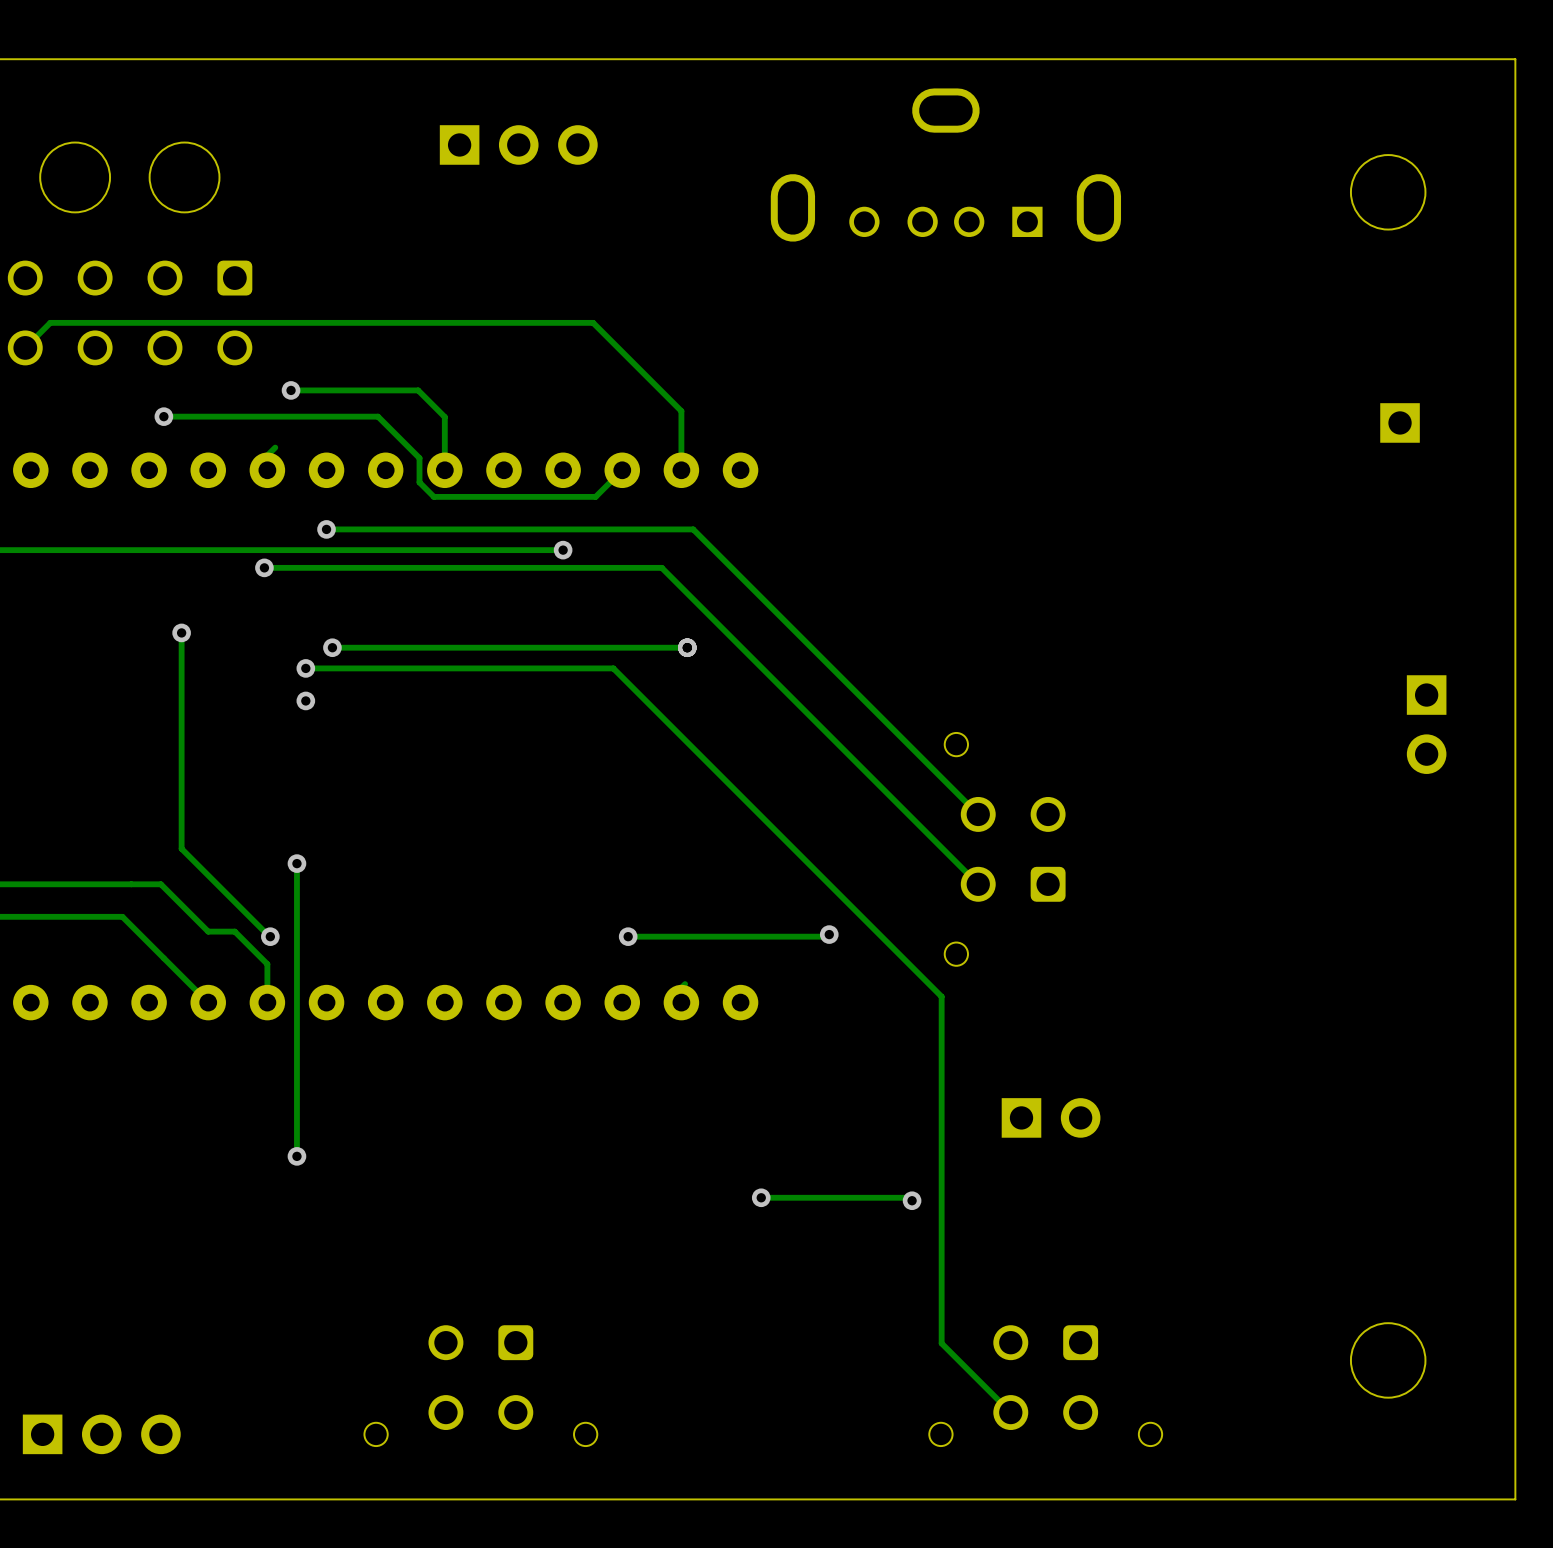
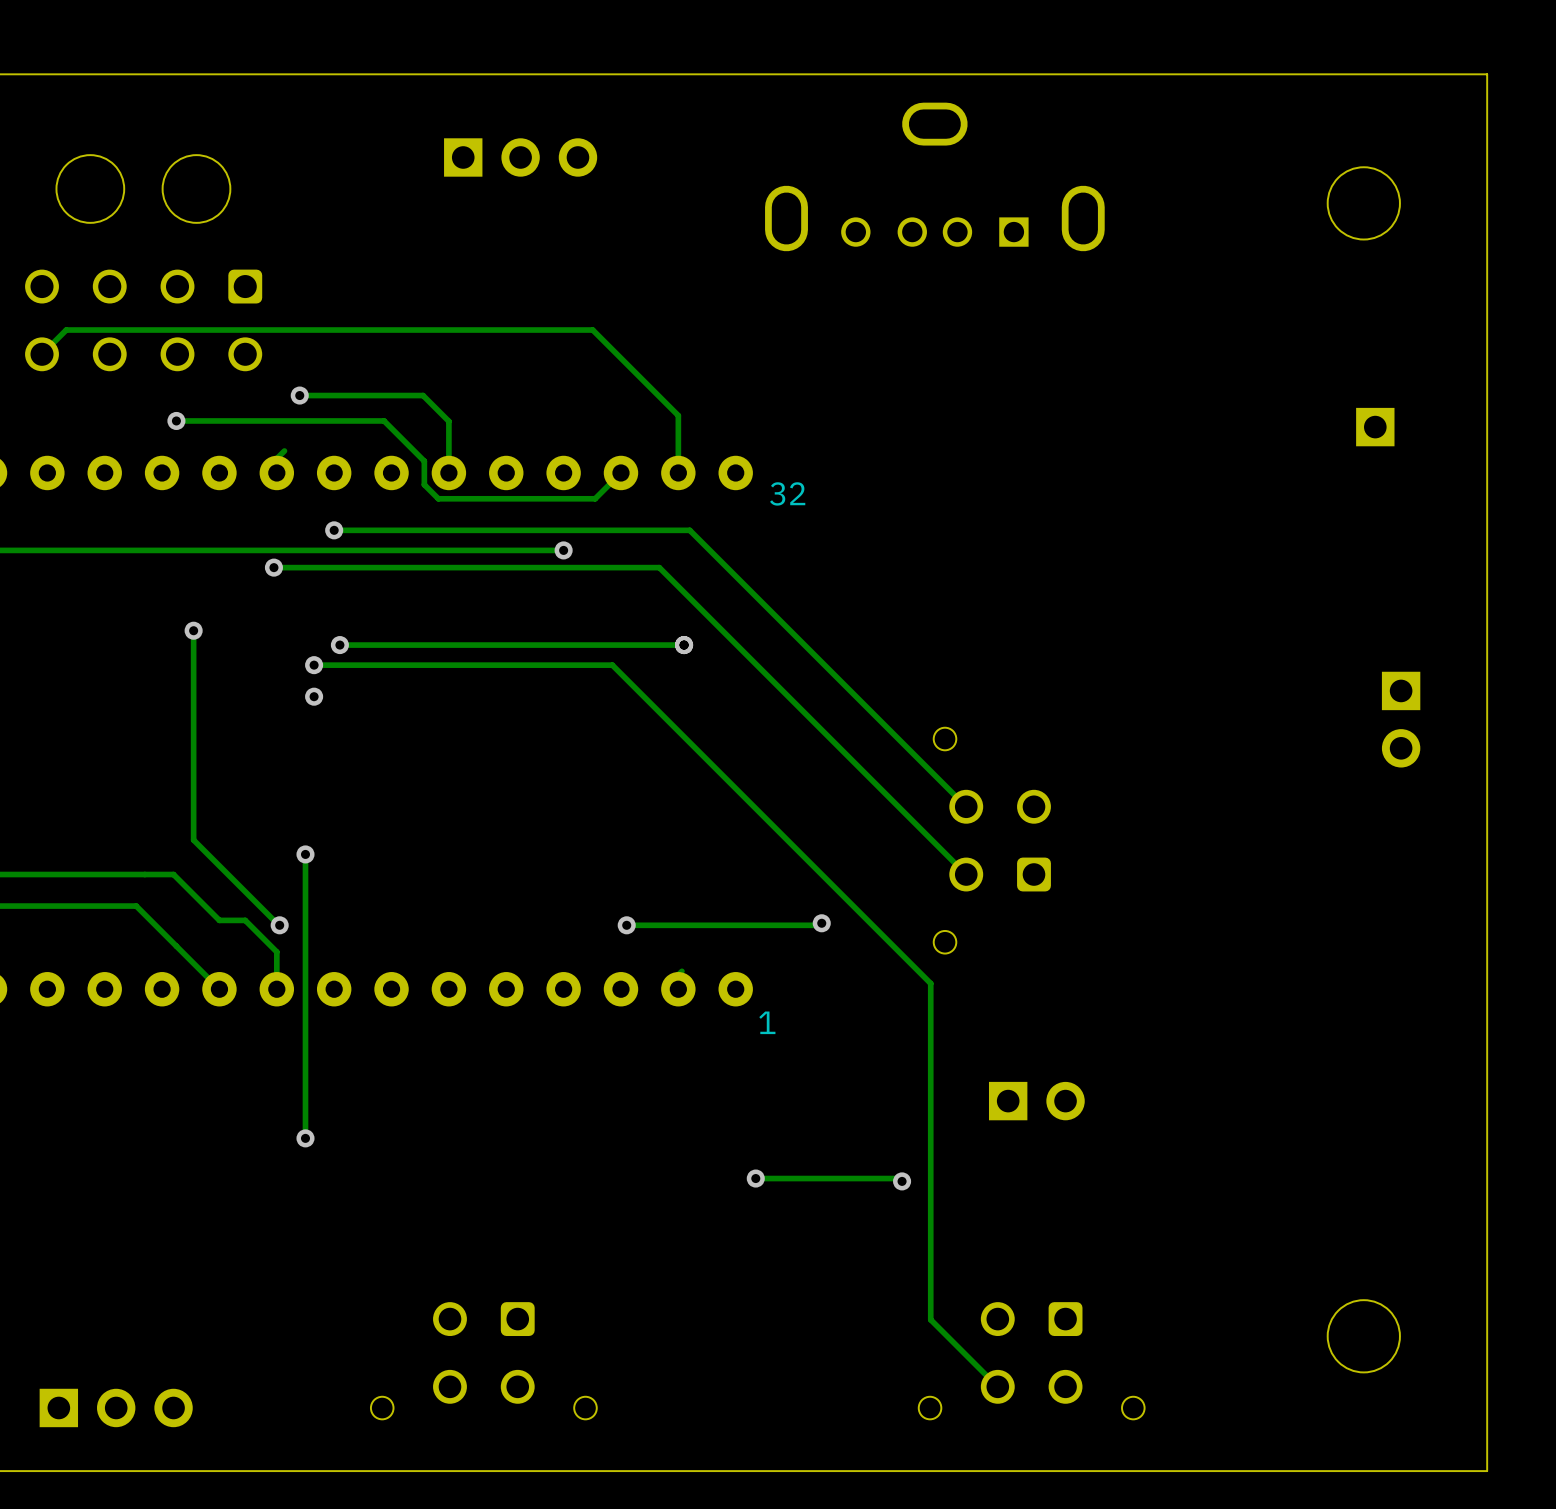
text: none -> 32 (787, 493)
text: none -> 1 (767, 1022)

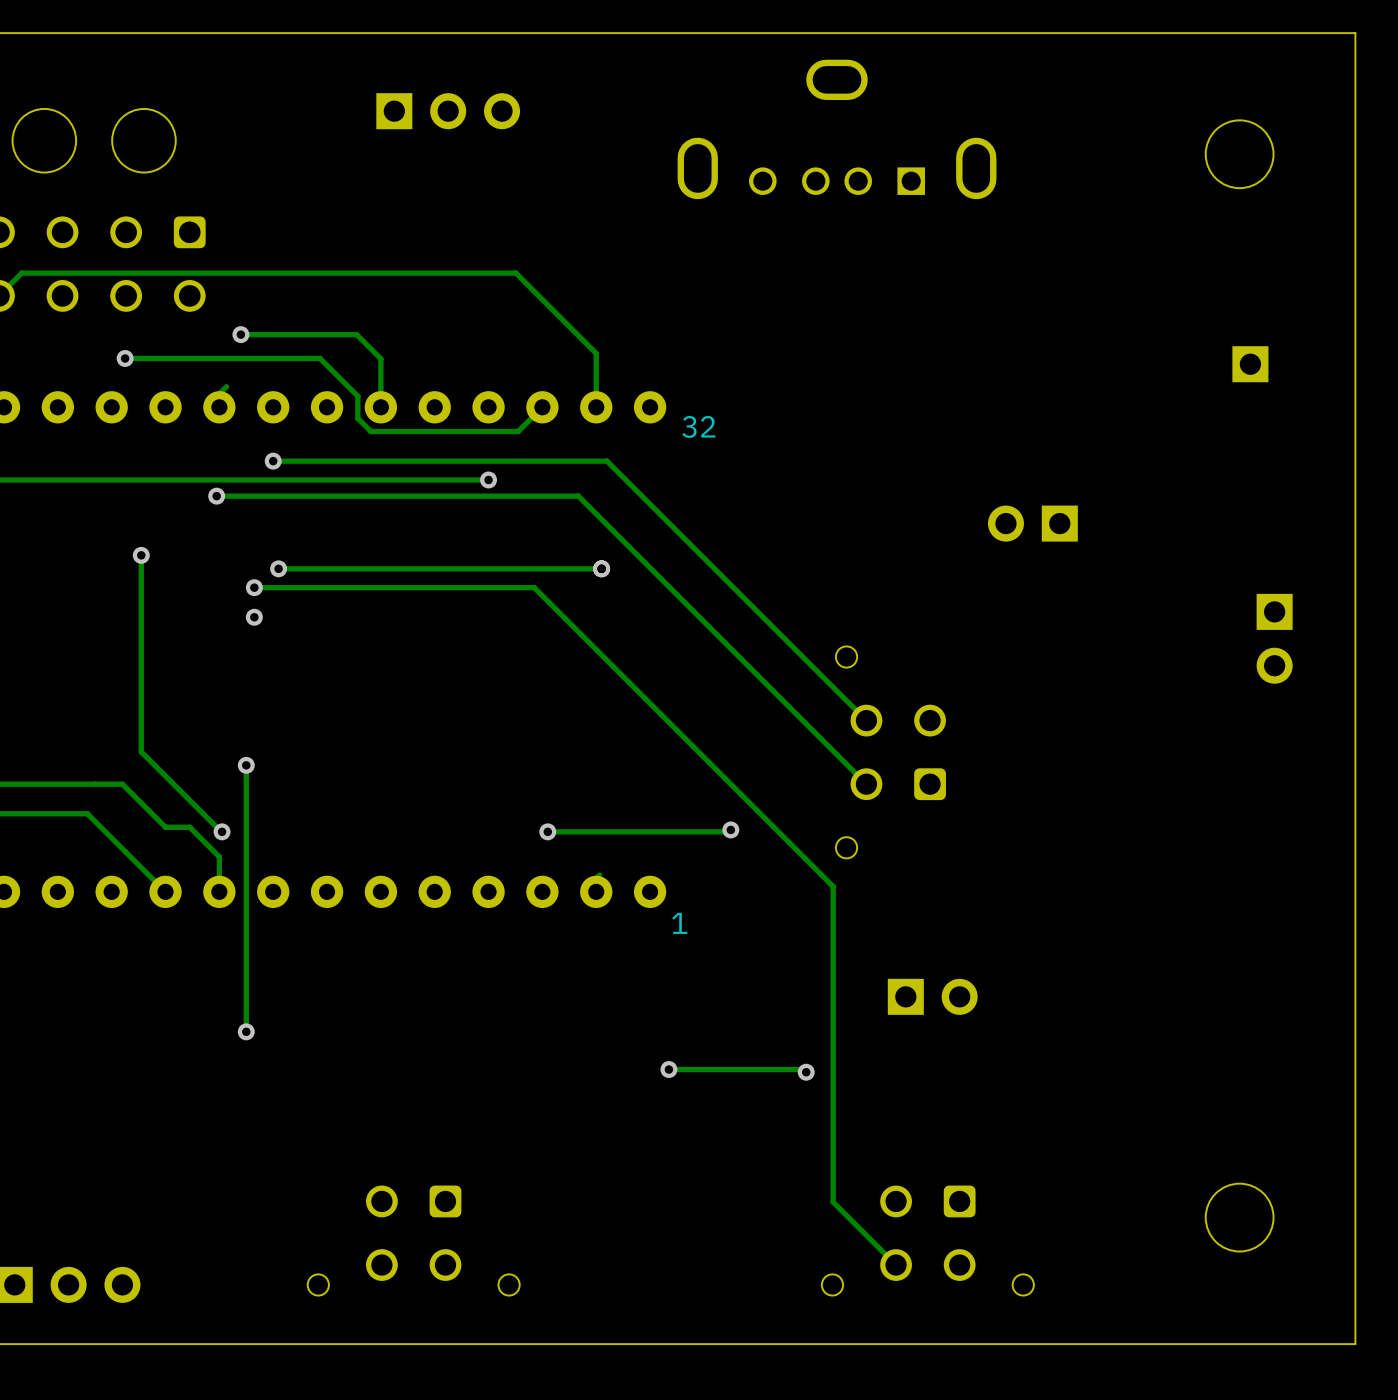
part: none -> (1032, 523)

